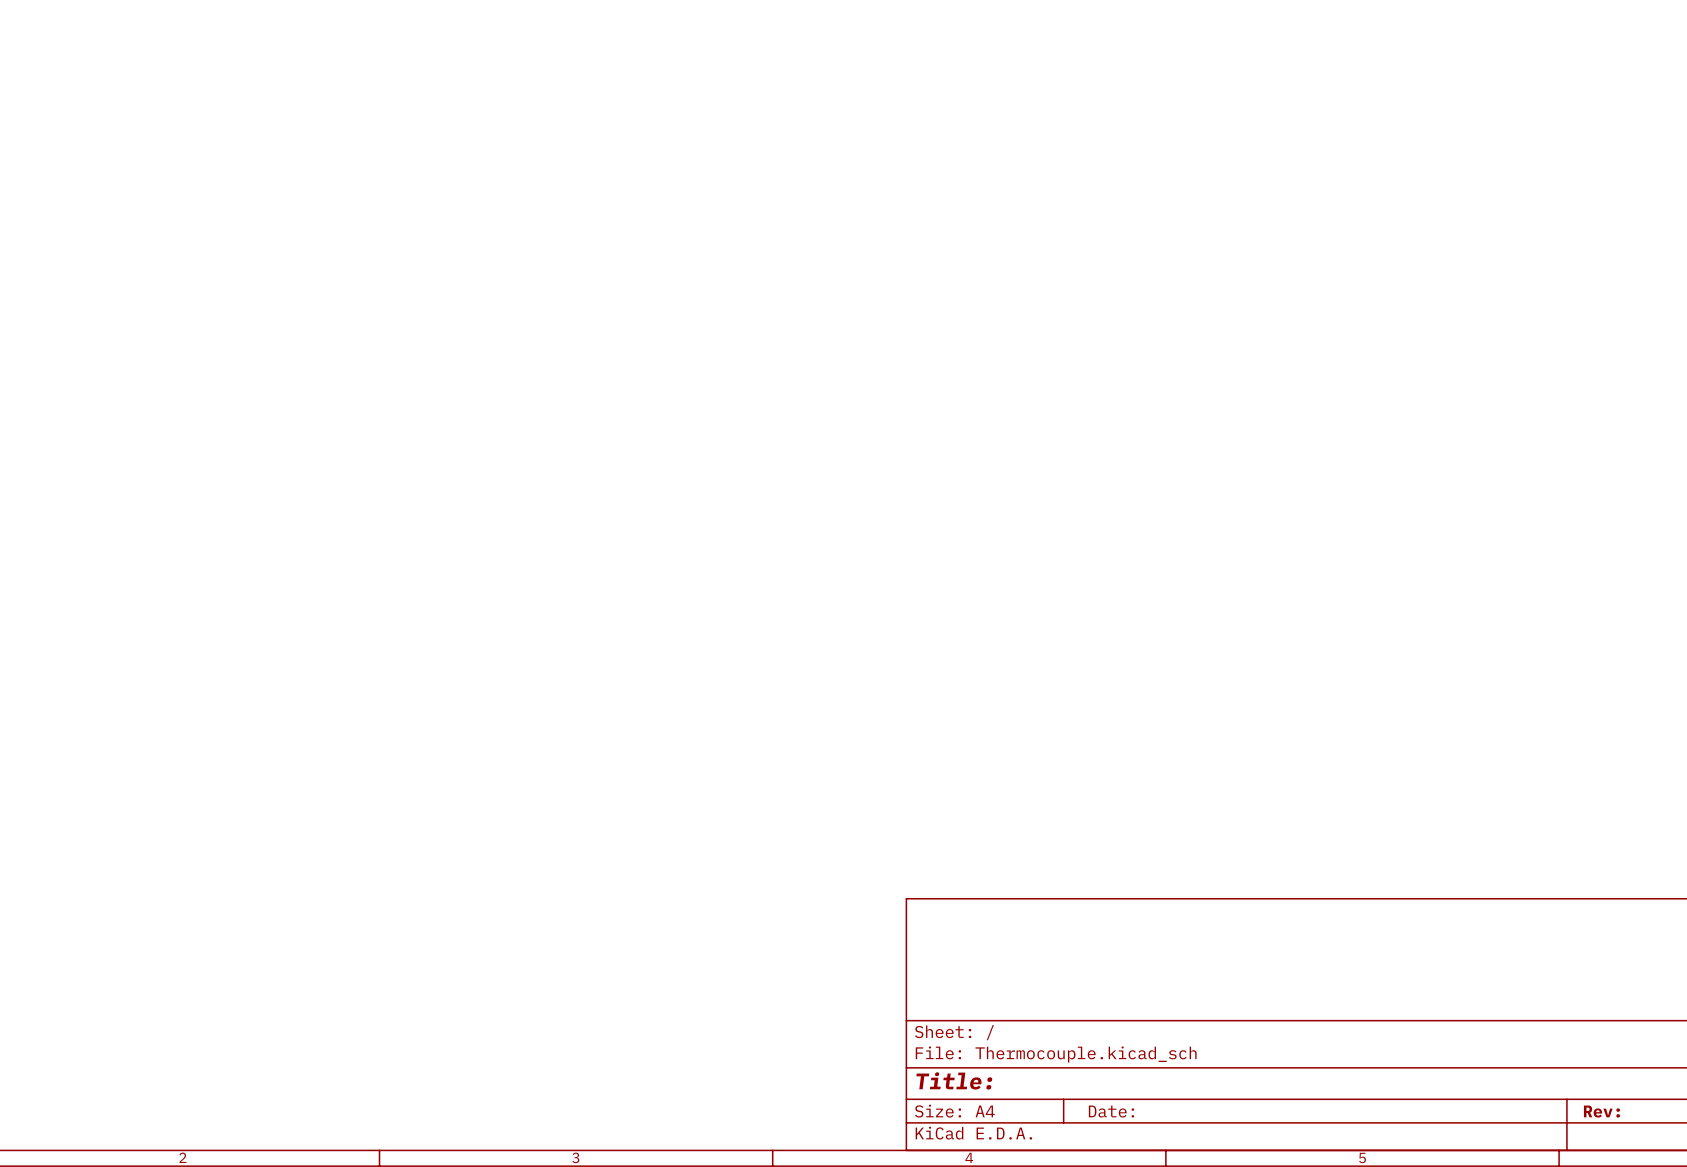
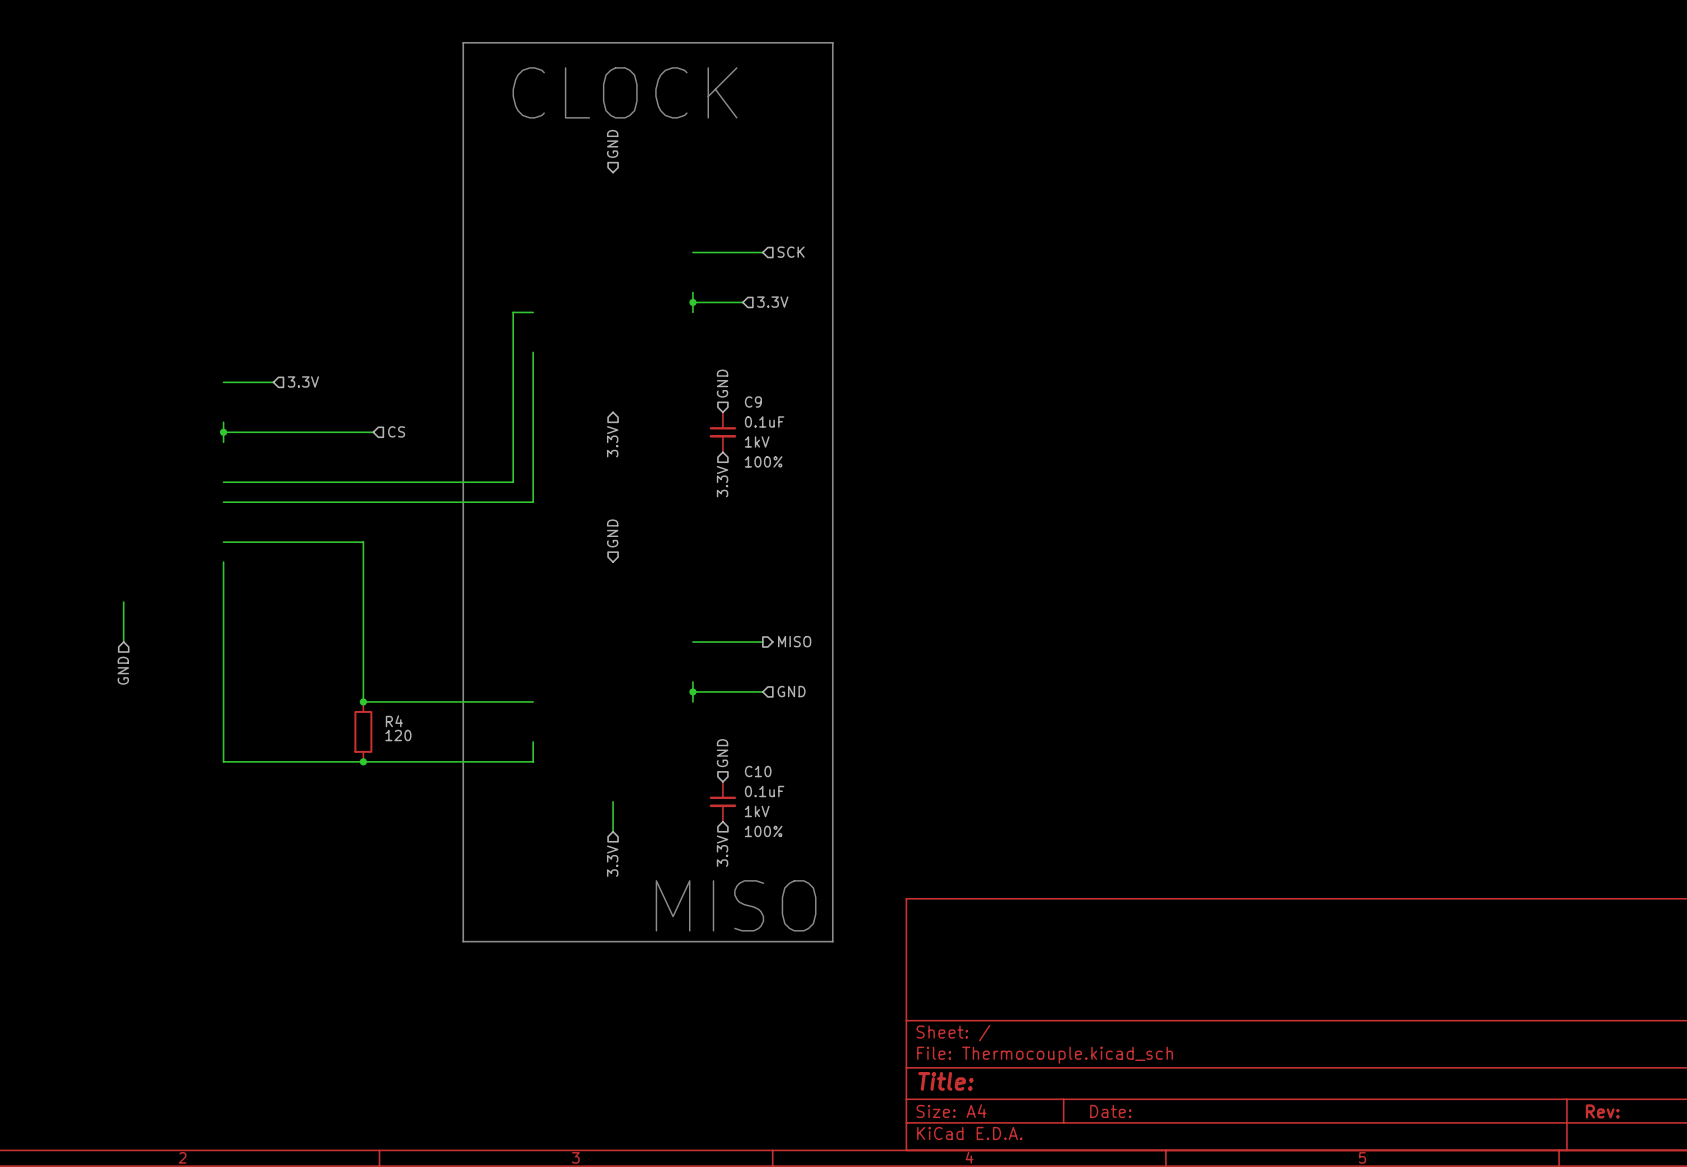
line: none -> (463, 42) (832, 42) (832, 941) (463, 941) (463, 42)
text: none -> CLOCK (625, 92)
hierarchical label: none -> GND (612, 143)
wire: none -> (692, 252) (762, 252)
hierarchical label: none -> SCK (791, 252)
wire: none -> (692, 292) (692, 312)
wire: none -> (692, 302) (742, 302)
junction: none -> (692, 302)
hierarchical label: none -> 3.3V (772, 302)
wire: none -> (533, 312) (513, 312) (513, 482) (223, 482)
wire: none -> (533, 352) (533, 502) (223, 502)
hierarchical label: none -> 3.3V (303, 381)
wire: none -> (223, 382) (273, 382)
hierarchical label: none -> GND (722, 383)
wire: none -> (223, 422) (223, 442)
hierarchical label: none -> CS (396, 431)
wire: none -> (223, 432) (373, 432)
junction: none -> (223, 432)
C9: none -> 0.1uF (722, 432)
hierarchical label: none -> 3.3V (612, 441)
hierarchical label: none -> 3.3V (722, 481)
hierarchical label: none -> GND (612, 533)
wire: none -> (223, 542) (363, 542) (363, 701) (533, 701)
wire: none -> (223, 562) (223, 761) (533, 761) (533, 741)
wire: none -> (123, 602) (123, 642)
hierarchical label: none -> MISO (794, 641)
wire: none -> (692, 642) (762, 642)
hierarchical label: none -> GND (123, 670)
wire: none -> (692, 681) (692, 701)
wire: none -> (692, 691) (762, 691)
junction: none -> (692, 691)
hierarchical label: none -> GND (791, 691)
junction: none -> (363, 701)
R4: none -> 120 (363, 731)
hierarchical label: none -> GND (722, 753)
junction: none -> (363, 761)
wire: none -> (613, 801) (613, 831)
C10: none -> 0.1uF (722, 801)
hierarchical label: none -> 3.3V (722, 851)
hierarchical label: none -> 3.3V (612, 861)
text: none -> MISO (736, 905)

